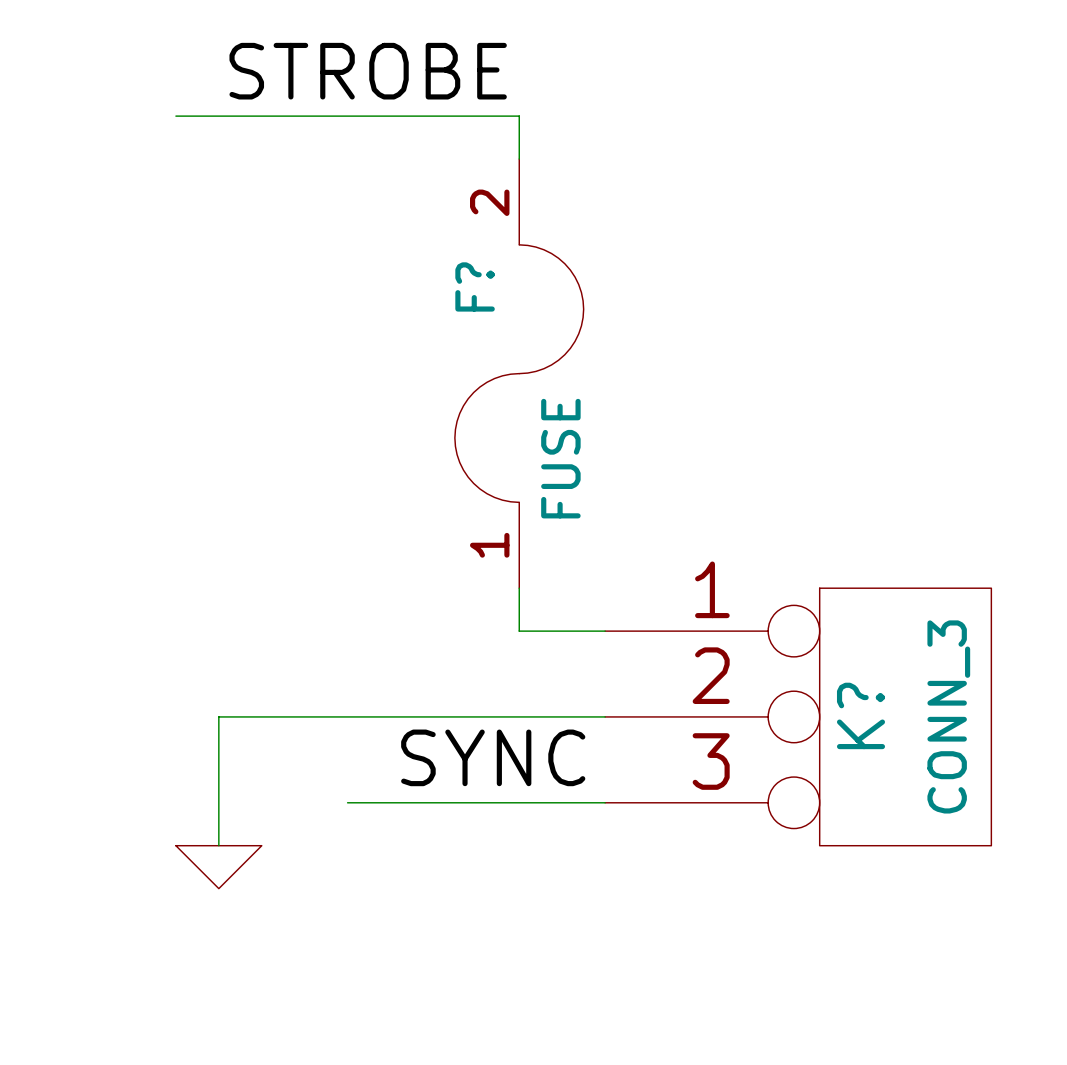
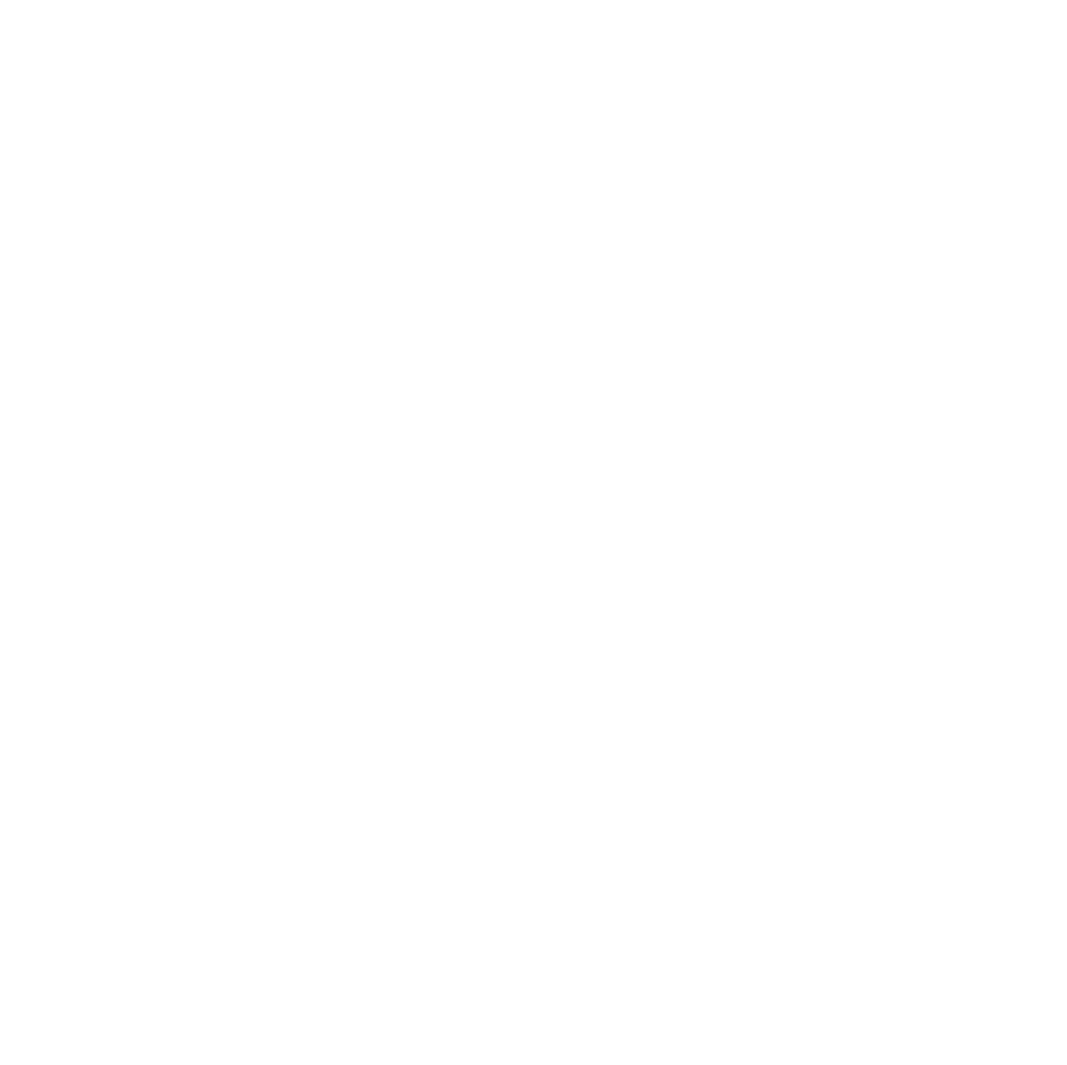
label: STROBE (368, 71) -> none
wire: (175, 116) (519, 116) (519, 159) -> none
F?: FUSE (519, 373) -> none
wire: (519, 588) (519, 631) (605, 631) -> none
wire: (605, 716) (218, 716) (218, 845) -> none
K?: CONN_3 (798, 716) -> none
label: SYNC (493, 757) -> none
wire: (347, 802) (605, 802) -> none
power symbol: (218, 867) -> none

